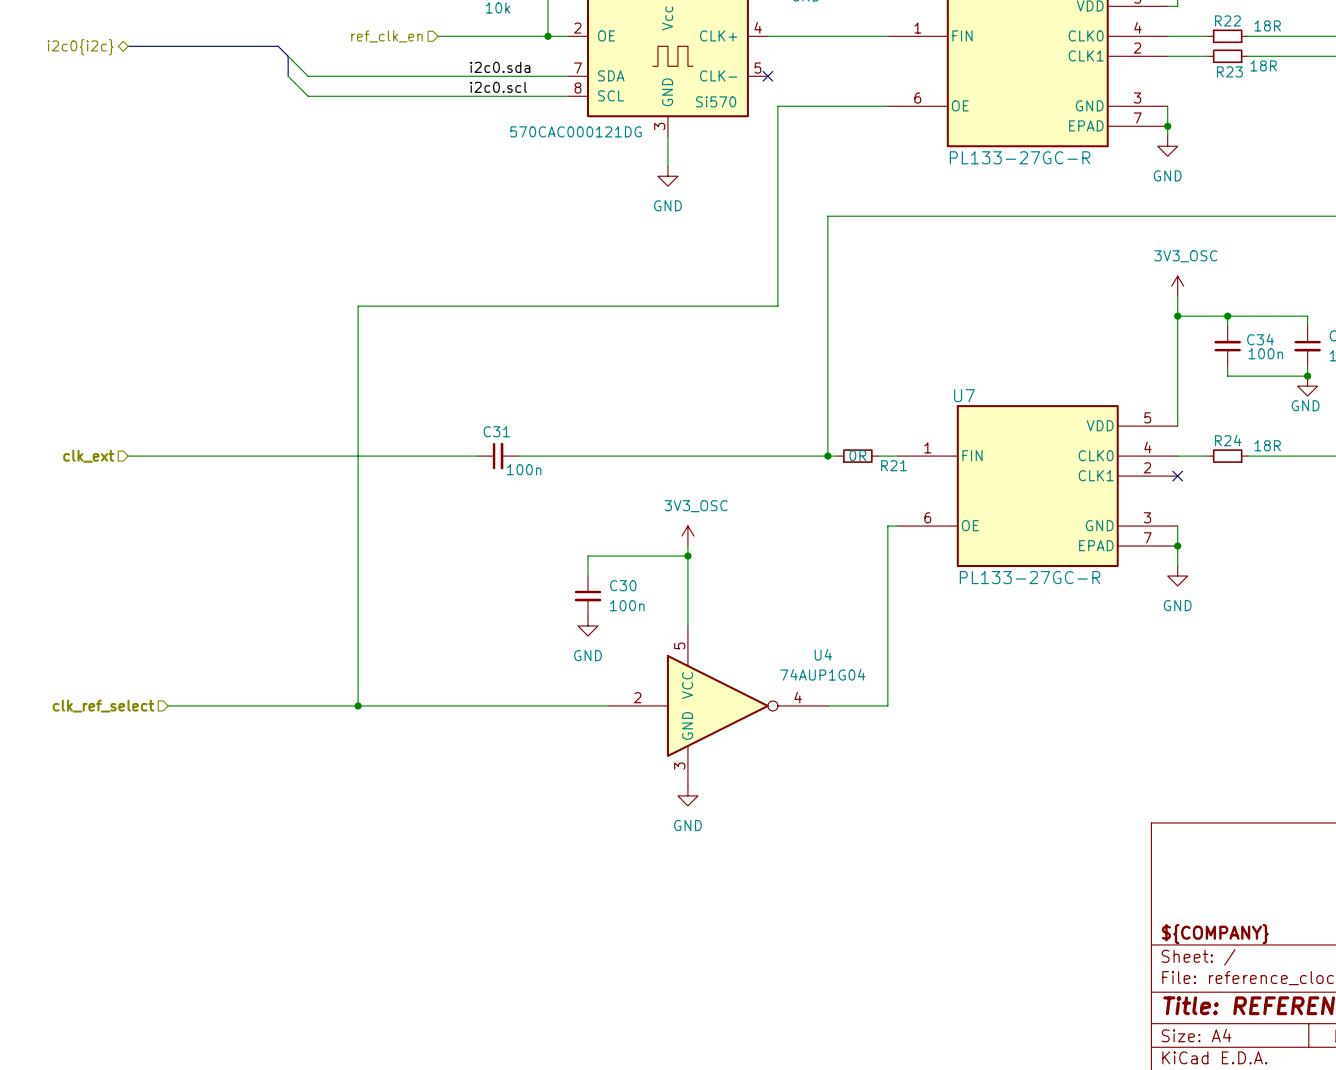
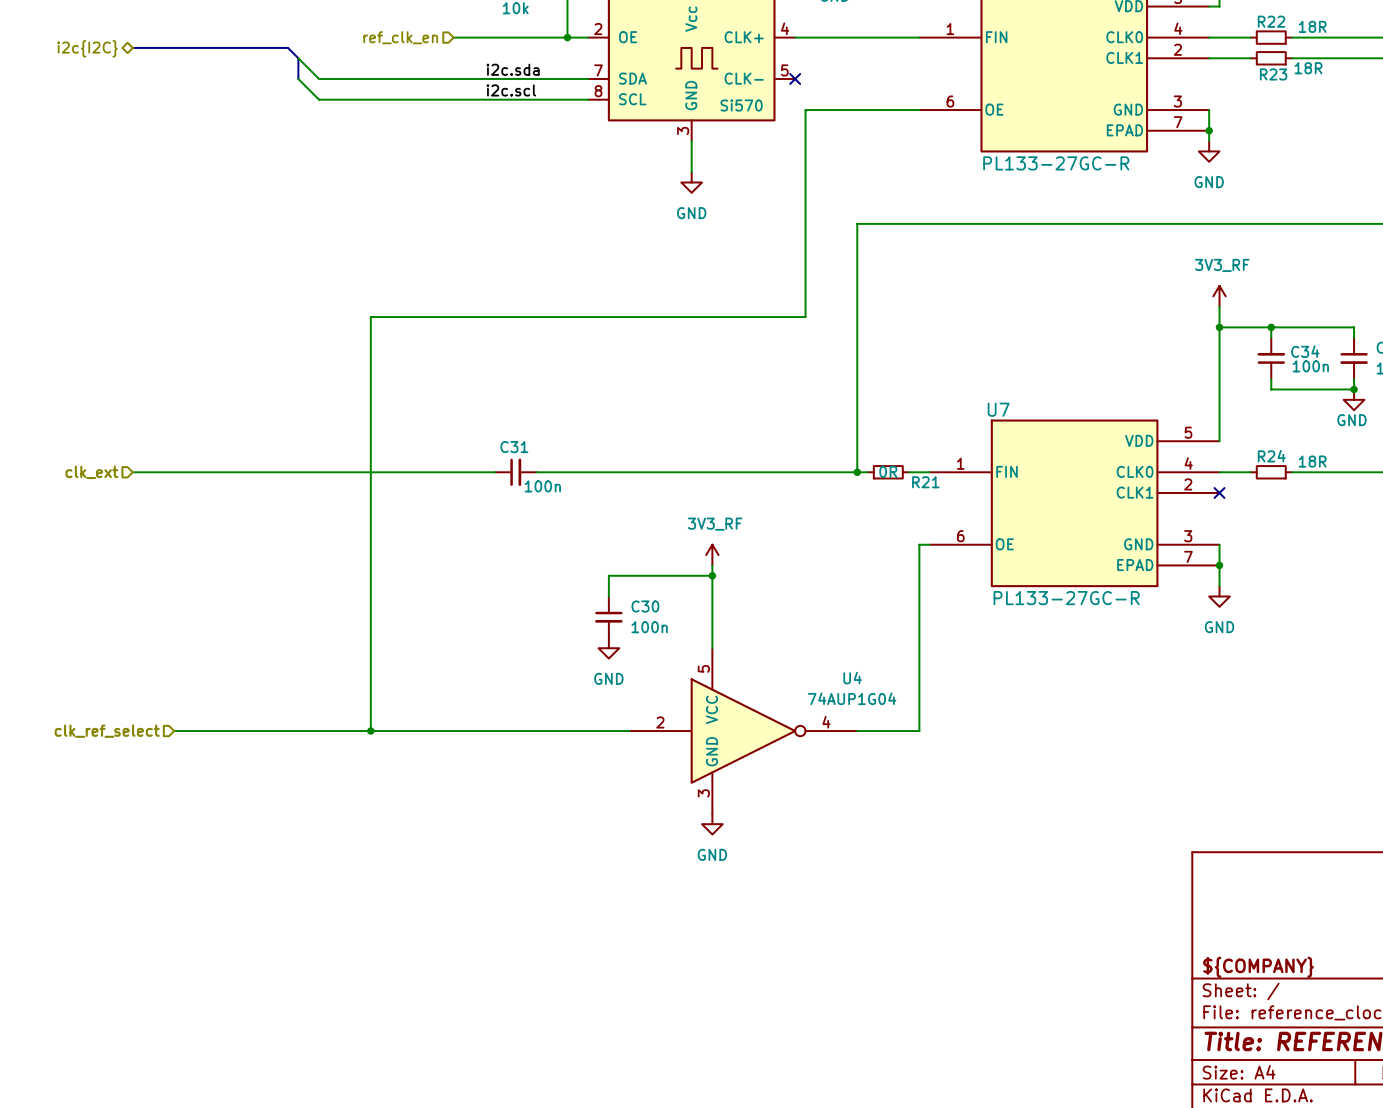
hierarchical label: i2c0{i2c} (80, 47) -> i2c{I2C} (87, 48)
label: i2c0.sda (500, 67) -> i2c.sda (513, 69)
label: i2c0.scl (498, 87) -> i2c.scl (511, 90)
part text: 570CAC000121DG (576, 131) -> none
power symbol: 3V3_OSC (1177, 286) -> 3V3_RF (1219, 296)
power symbol: 3V3_OSC (687, 536) -> 3V3_RF (712, 555)

